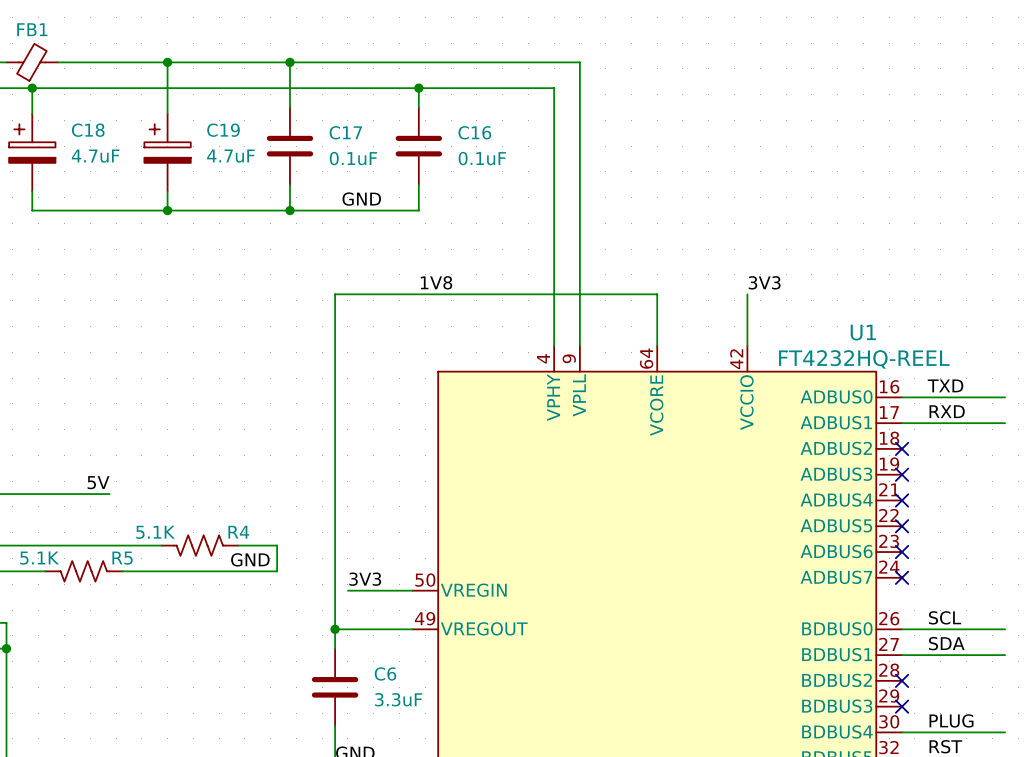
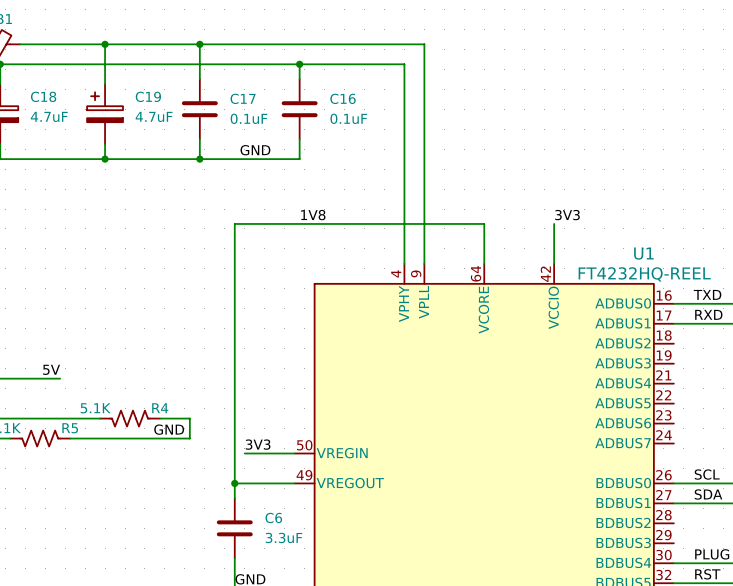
no-connect mark: (902, 448) -> none
no-connect mark: (902, 474) -> none
no-connect mark: (902, 500) -> none
no-connect mark: (902, 526) -> none
no-connect mark: (902, 552) -> none
no-connect mark: (902, 577) -> none
no-connect mark: (902, 680) -> none
no-connect mark: (902, 706) -> none

